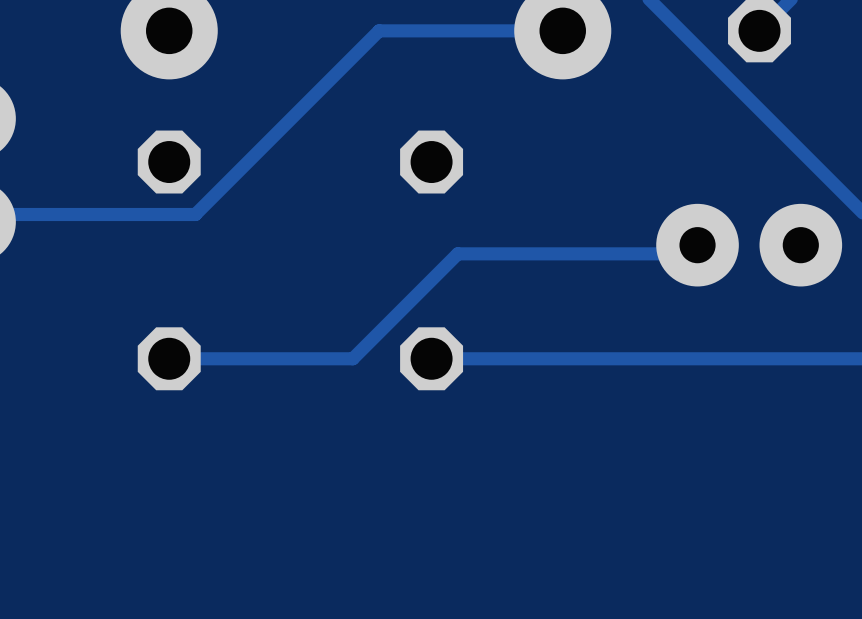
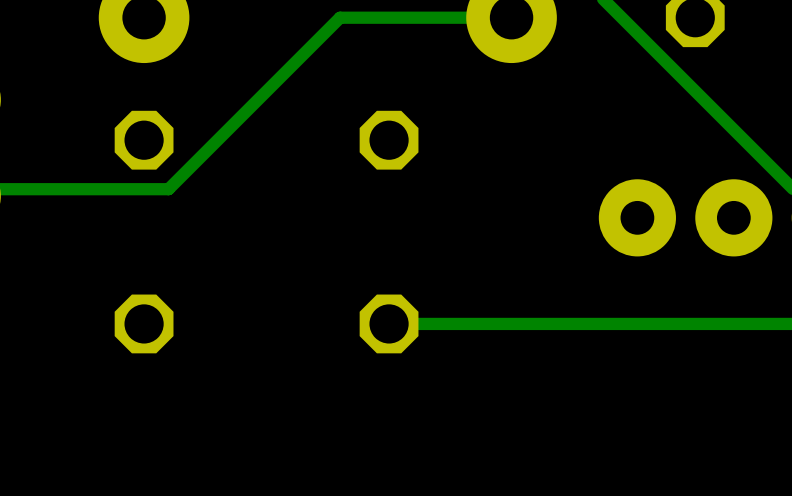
track: (697, 245) (693, 253) (457, 253) (352, 358) (169, 358) -> none

